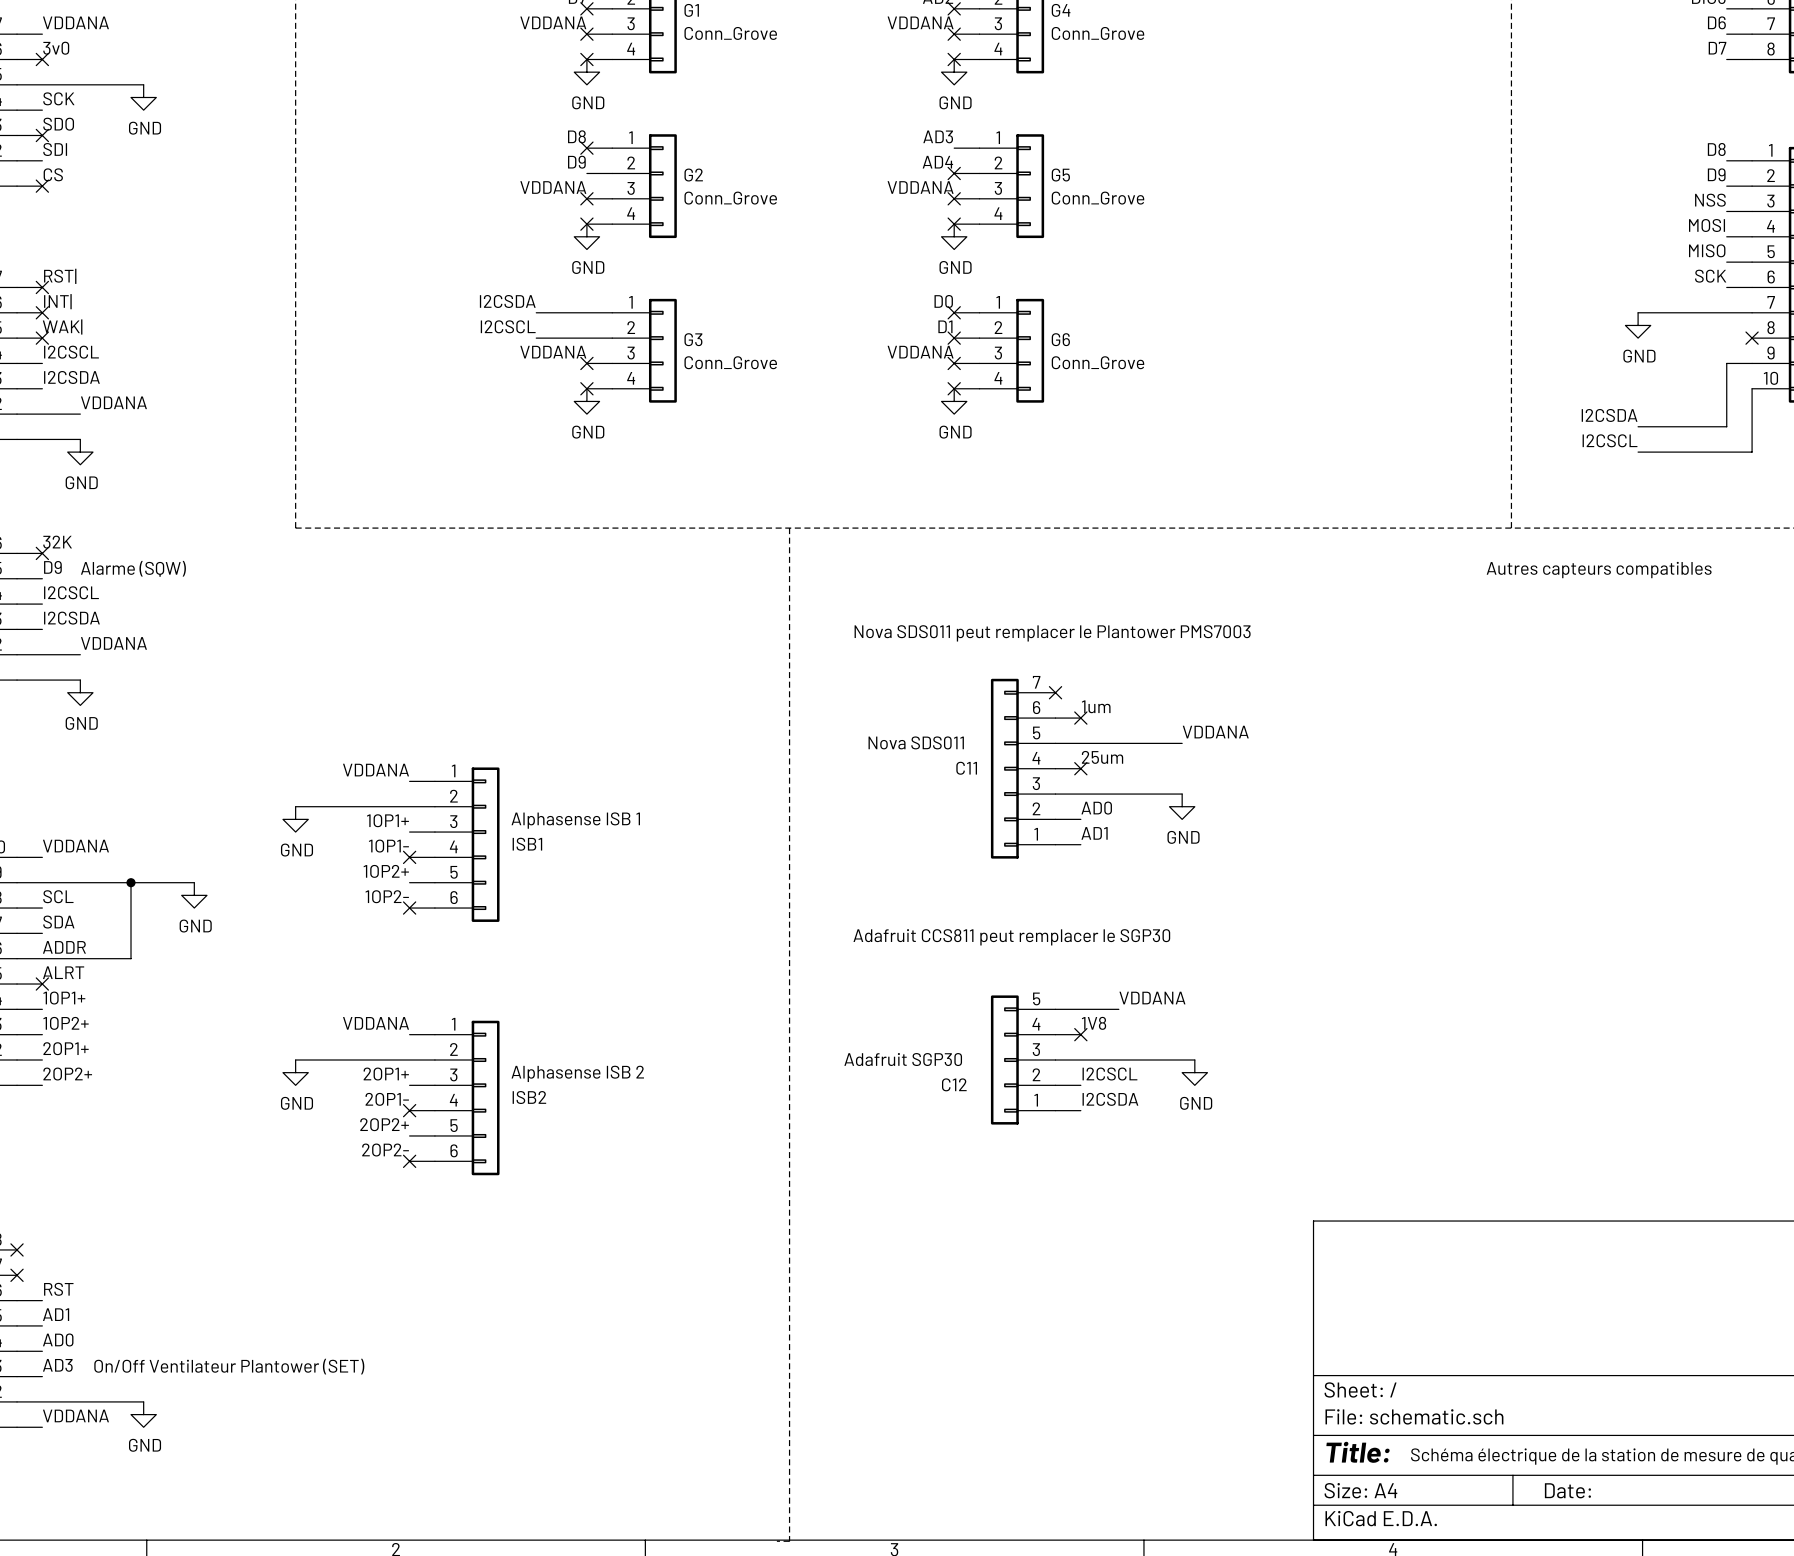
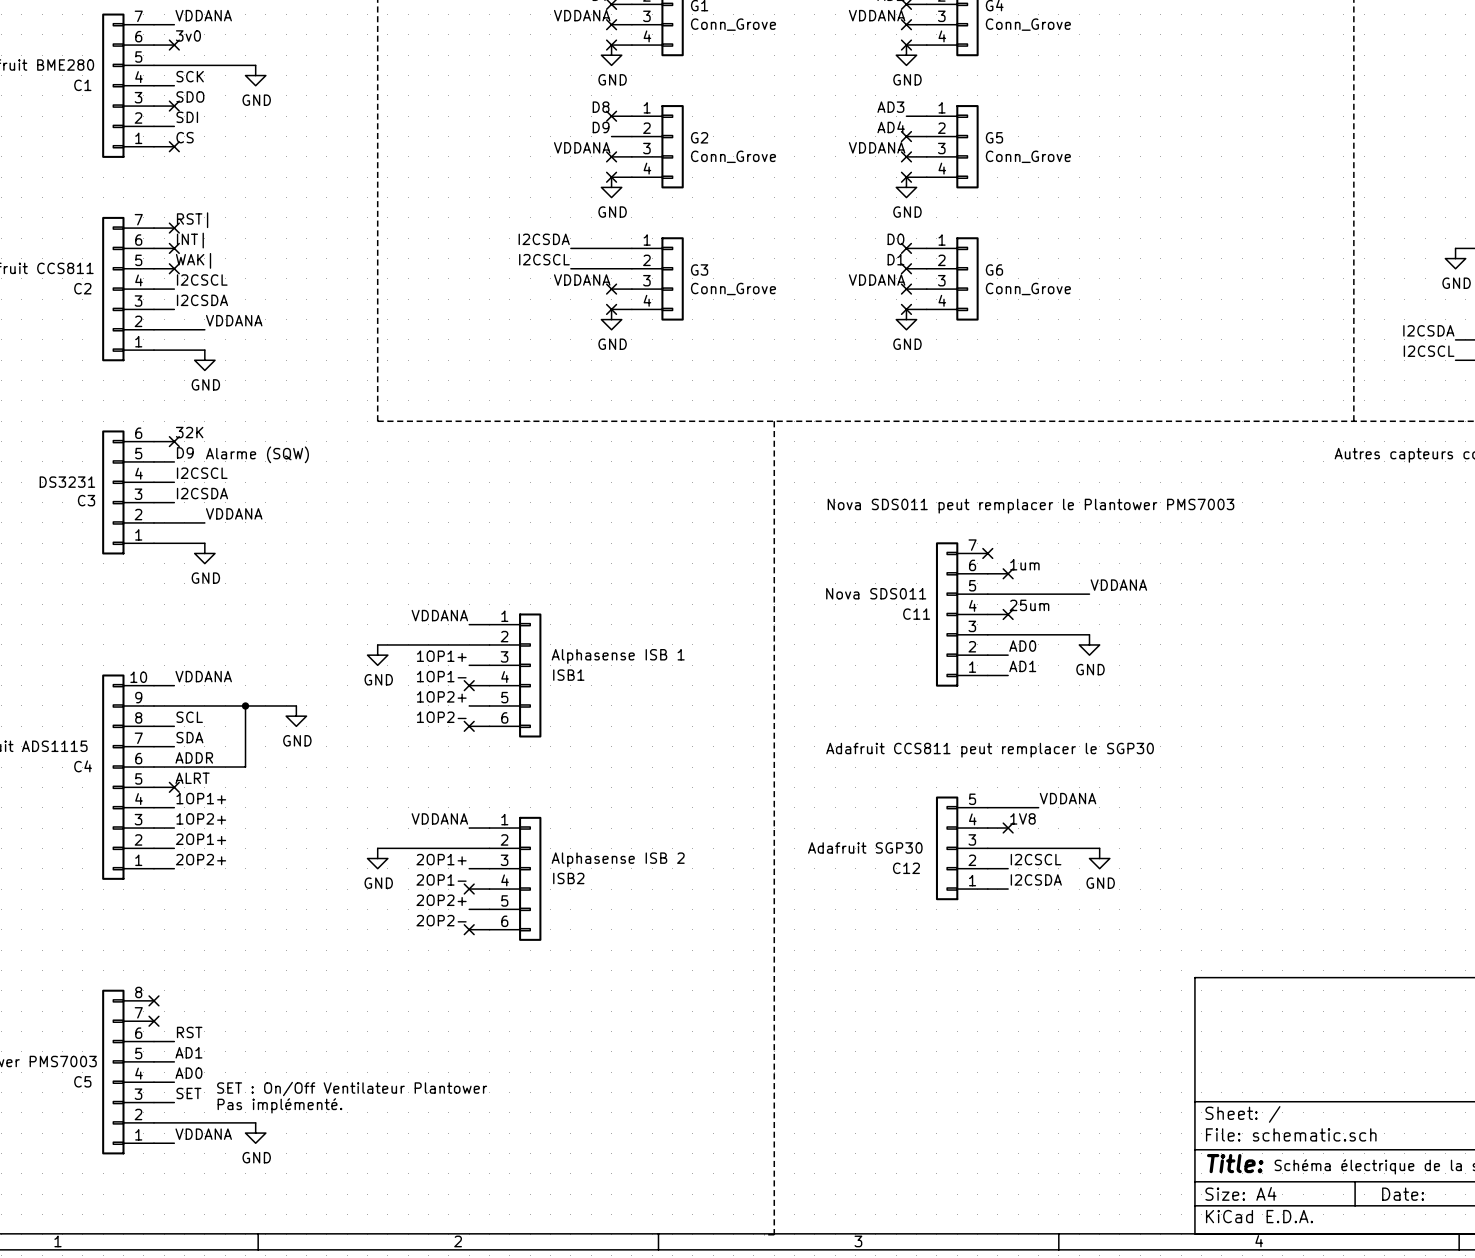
label: AD3 (57, 1365) -> SET (188, 1093)
text: On/Off Ventilateur Plantower (SET) (229, 1366) -> SET : On/Off Ventilateur Plantower (352, 1088)
text: none -> Pas implémenté. (279, 1105)

